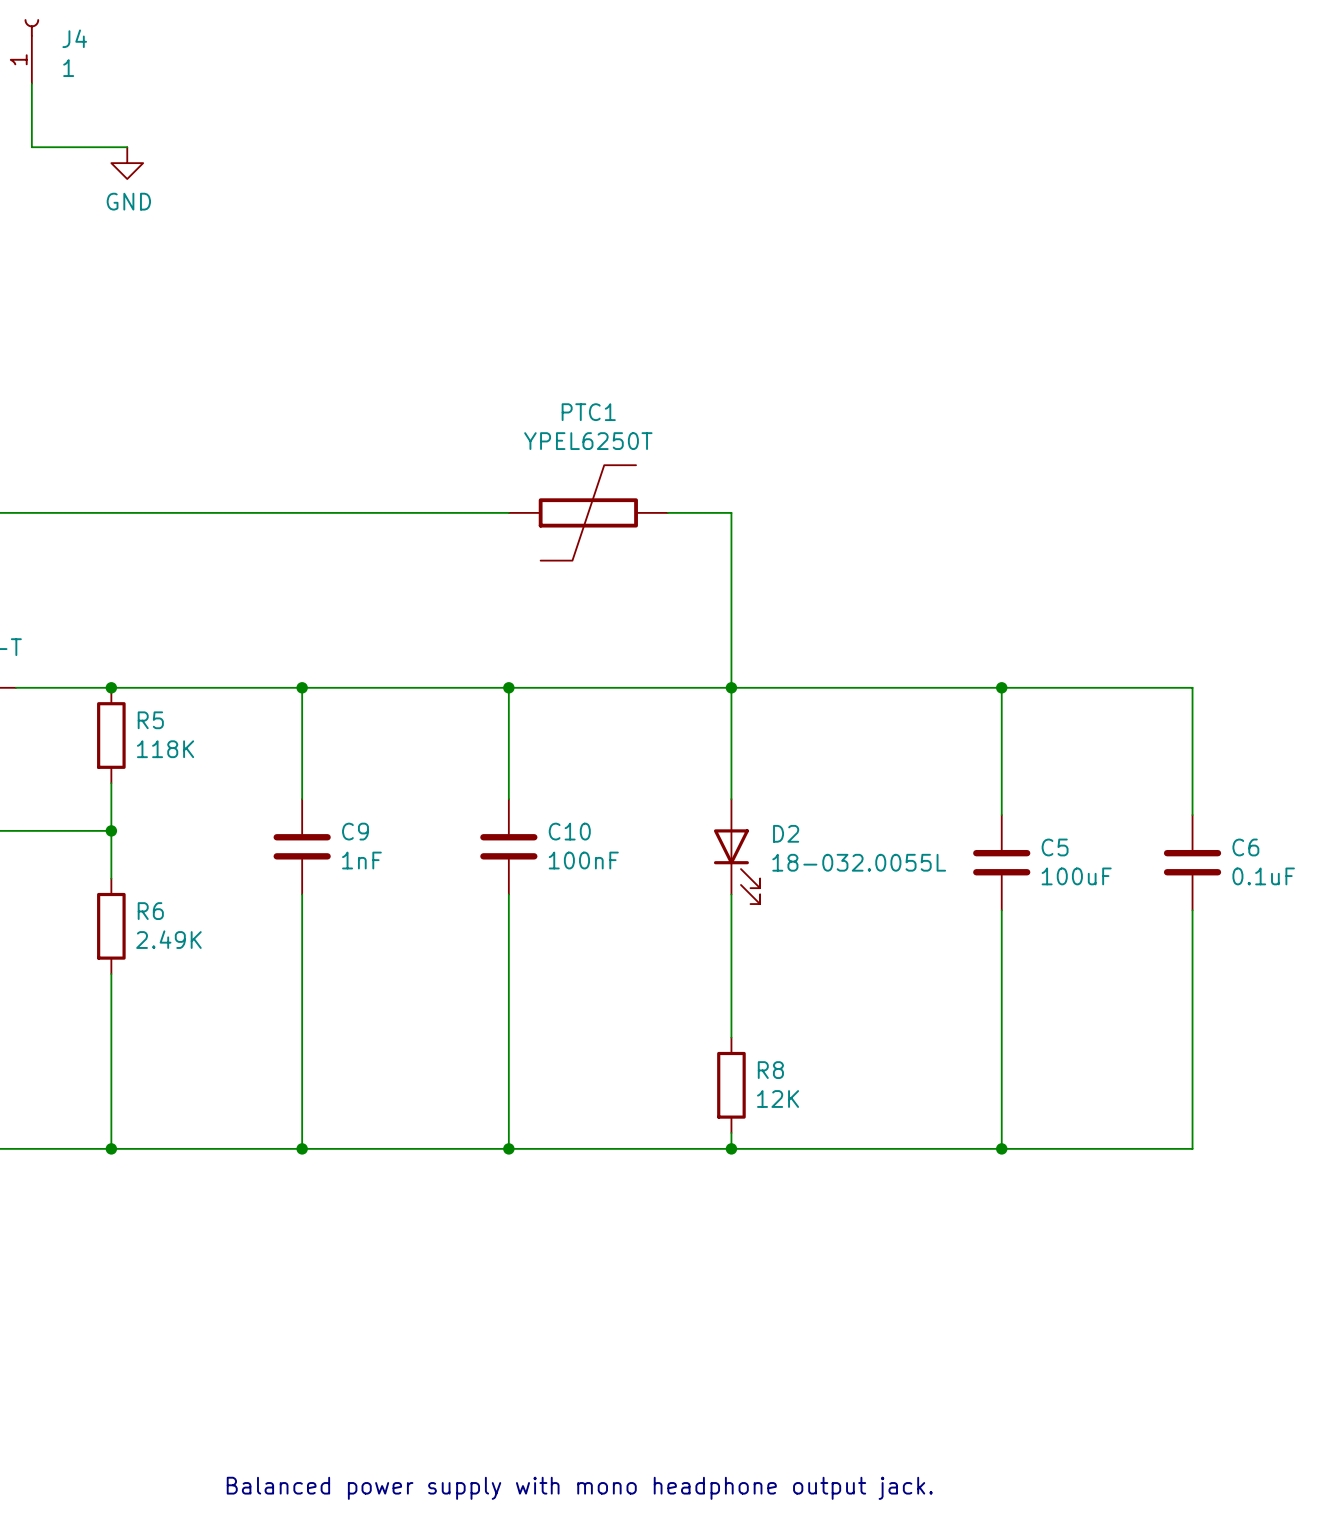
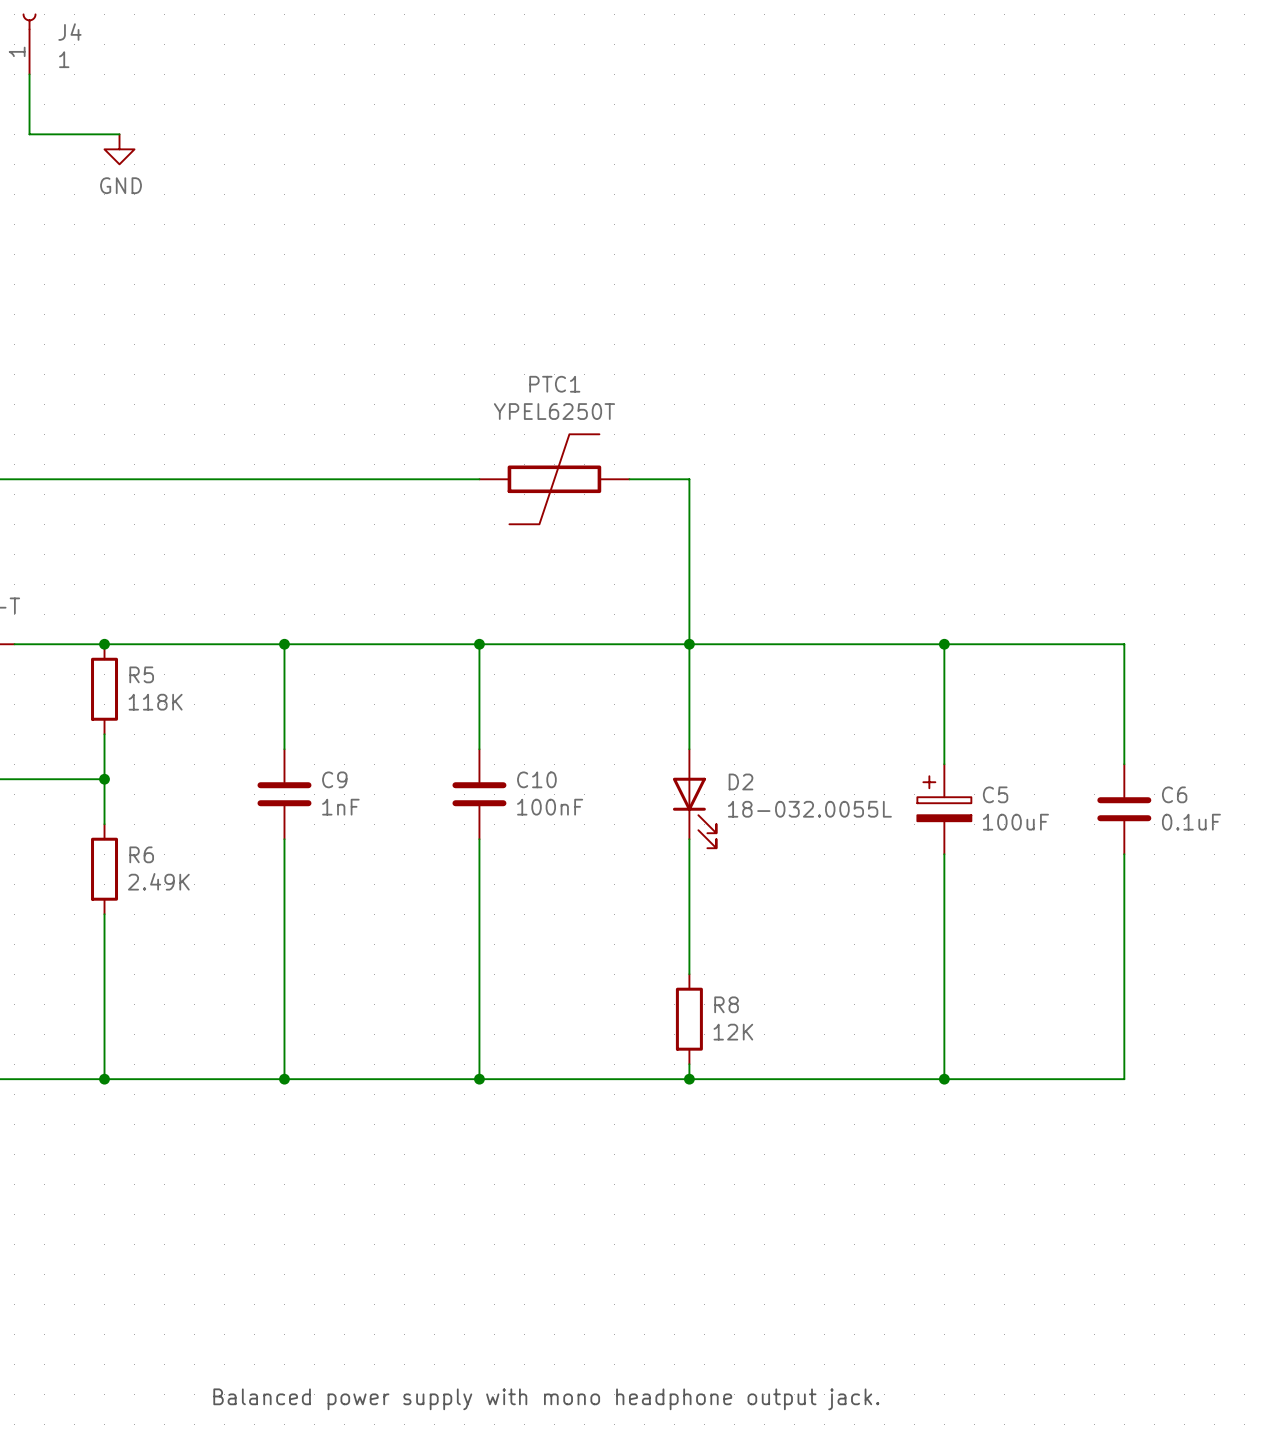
C5 symbol: [973, 815, 1031, 911] -> [917, 764, 972, 855]

